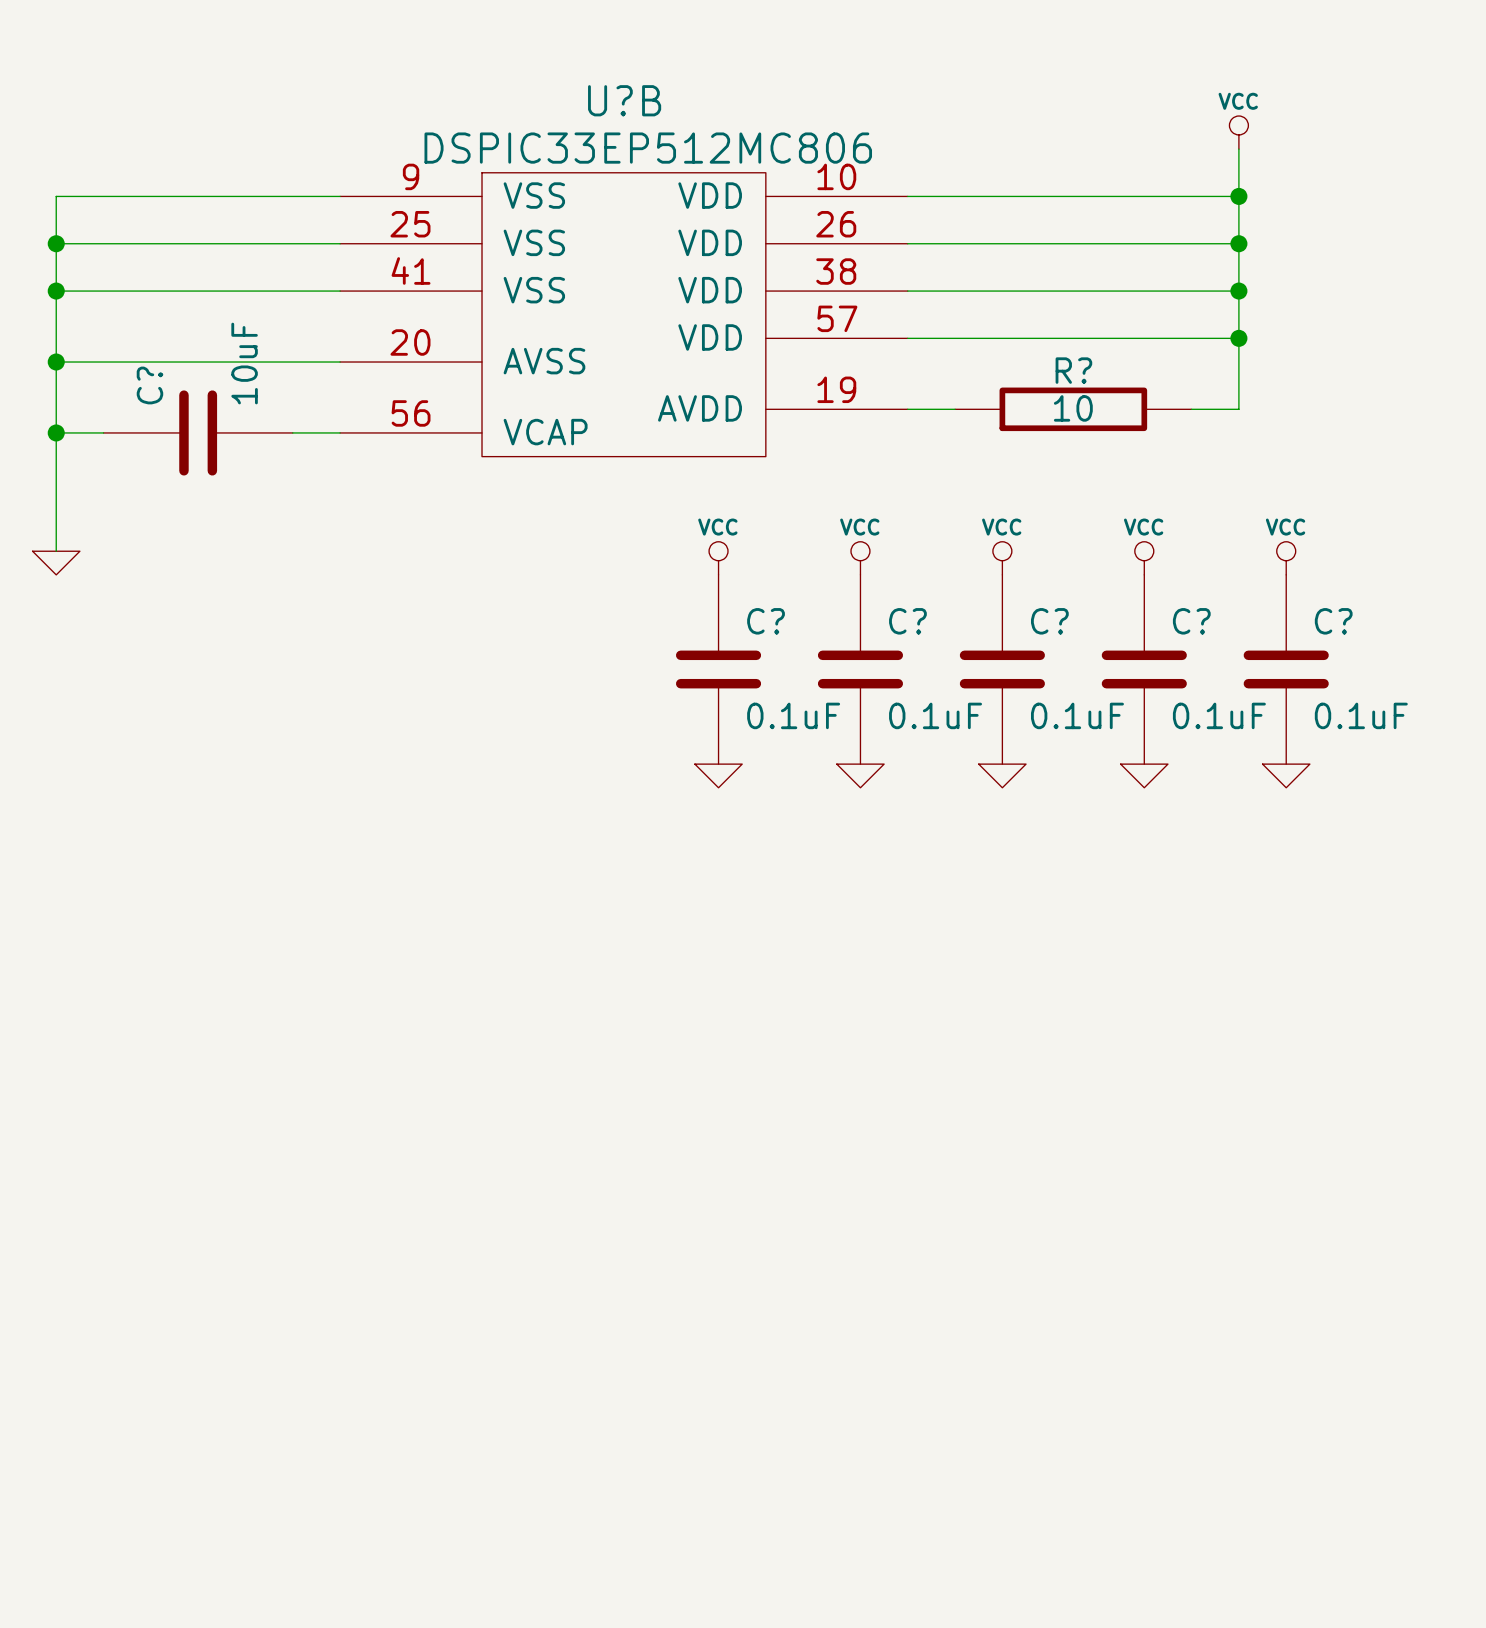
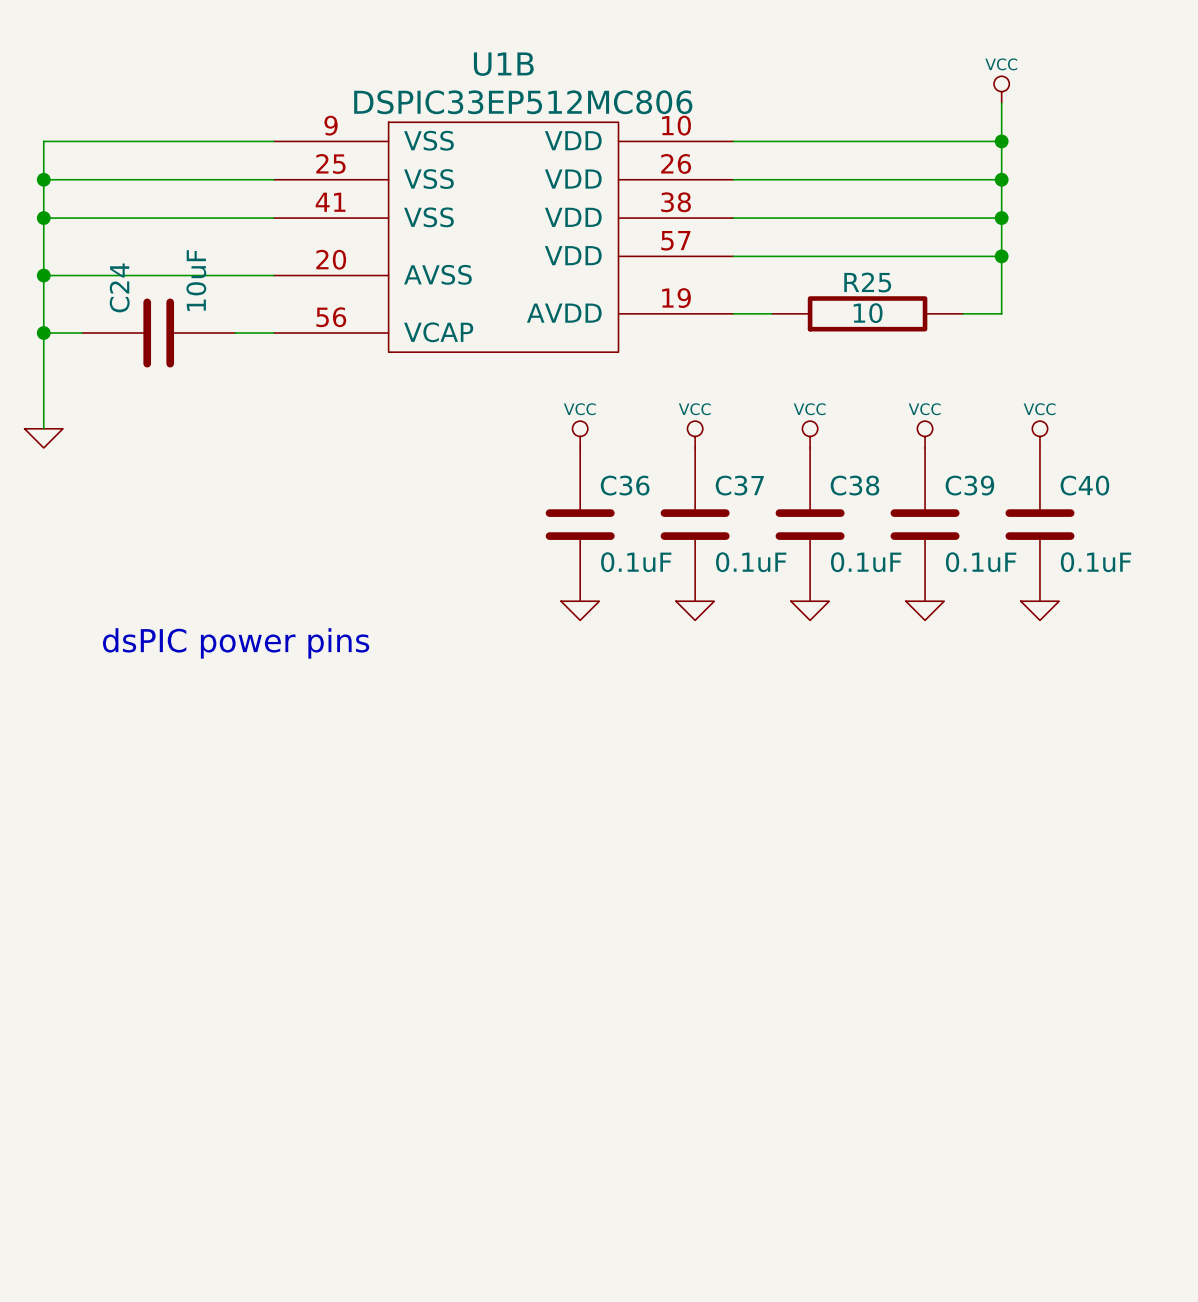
U?B name: U?B (624, 100) -> U1B (503, 64)
R? name: R? (1073, 370) -> R25 (867, 282)
C? name: C? (149, 385) -> C24 (119, 287)
C? name: C? (766, 621) -> C36 (625, 485)
C? name: C? (907, 621) -> C37 (739, 485)
C? name: C? (1049, 621) -> C38 (854, 485)
C? name: C? (1191, 621) -> C39 (969, 485)
C? name: C? (1333, 621) -> C40 (1084, 485)
text: none -> dsPIC power pins (236, 643)

